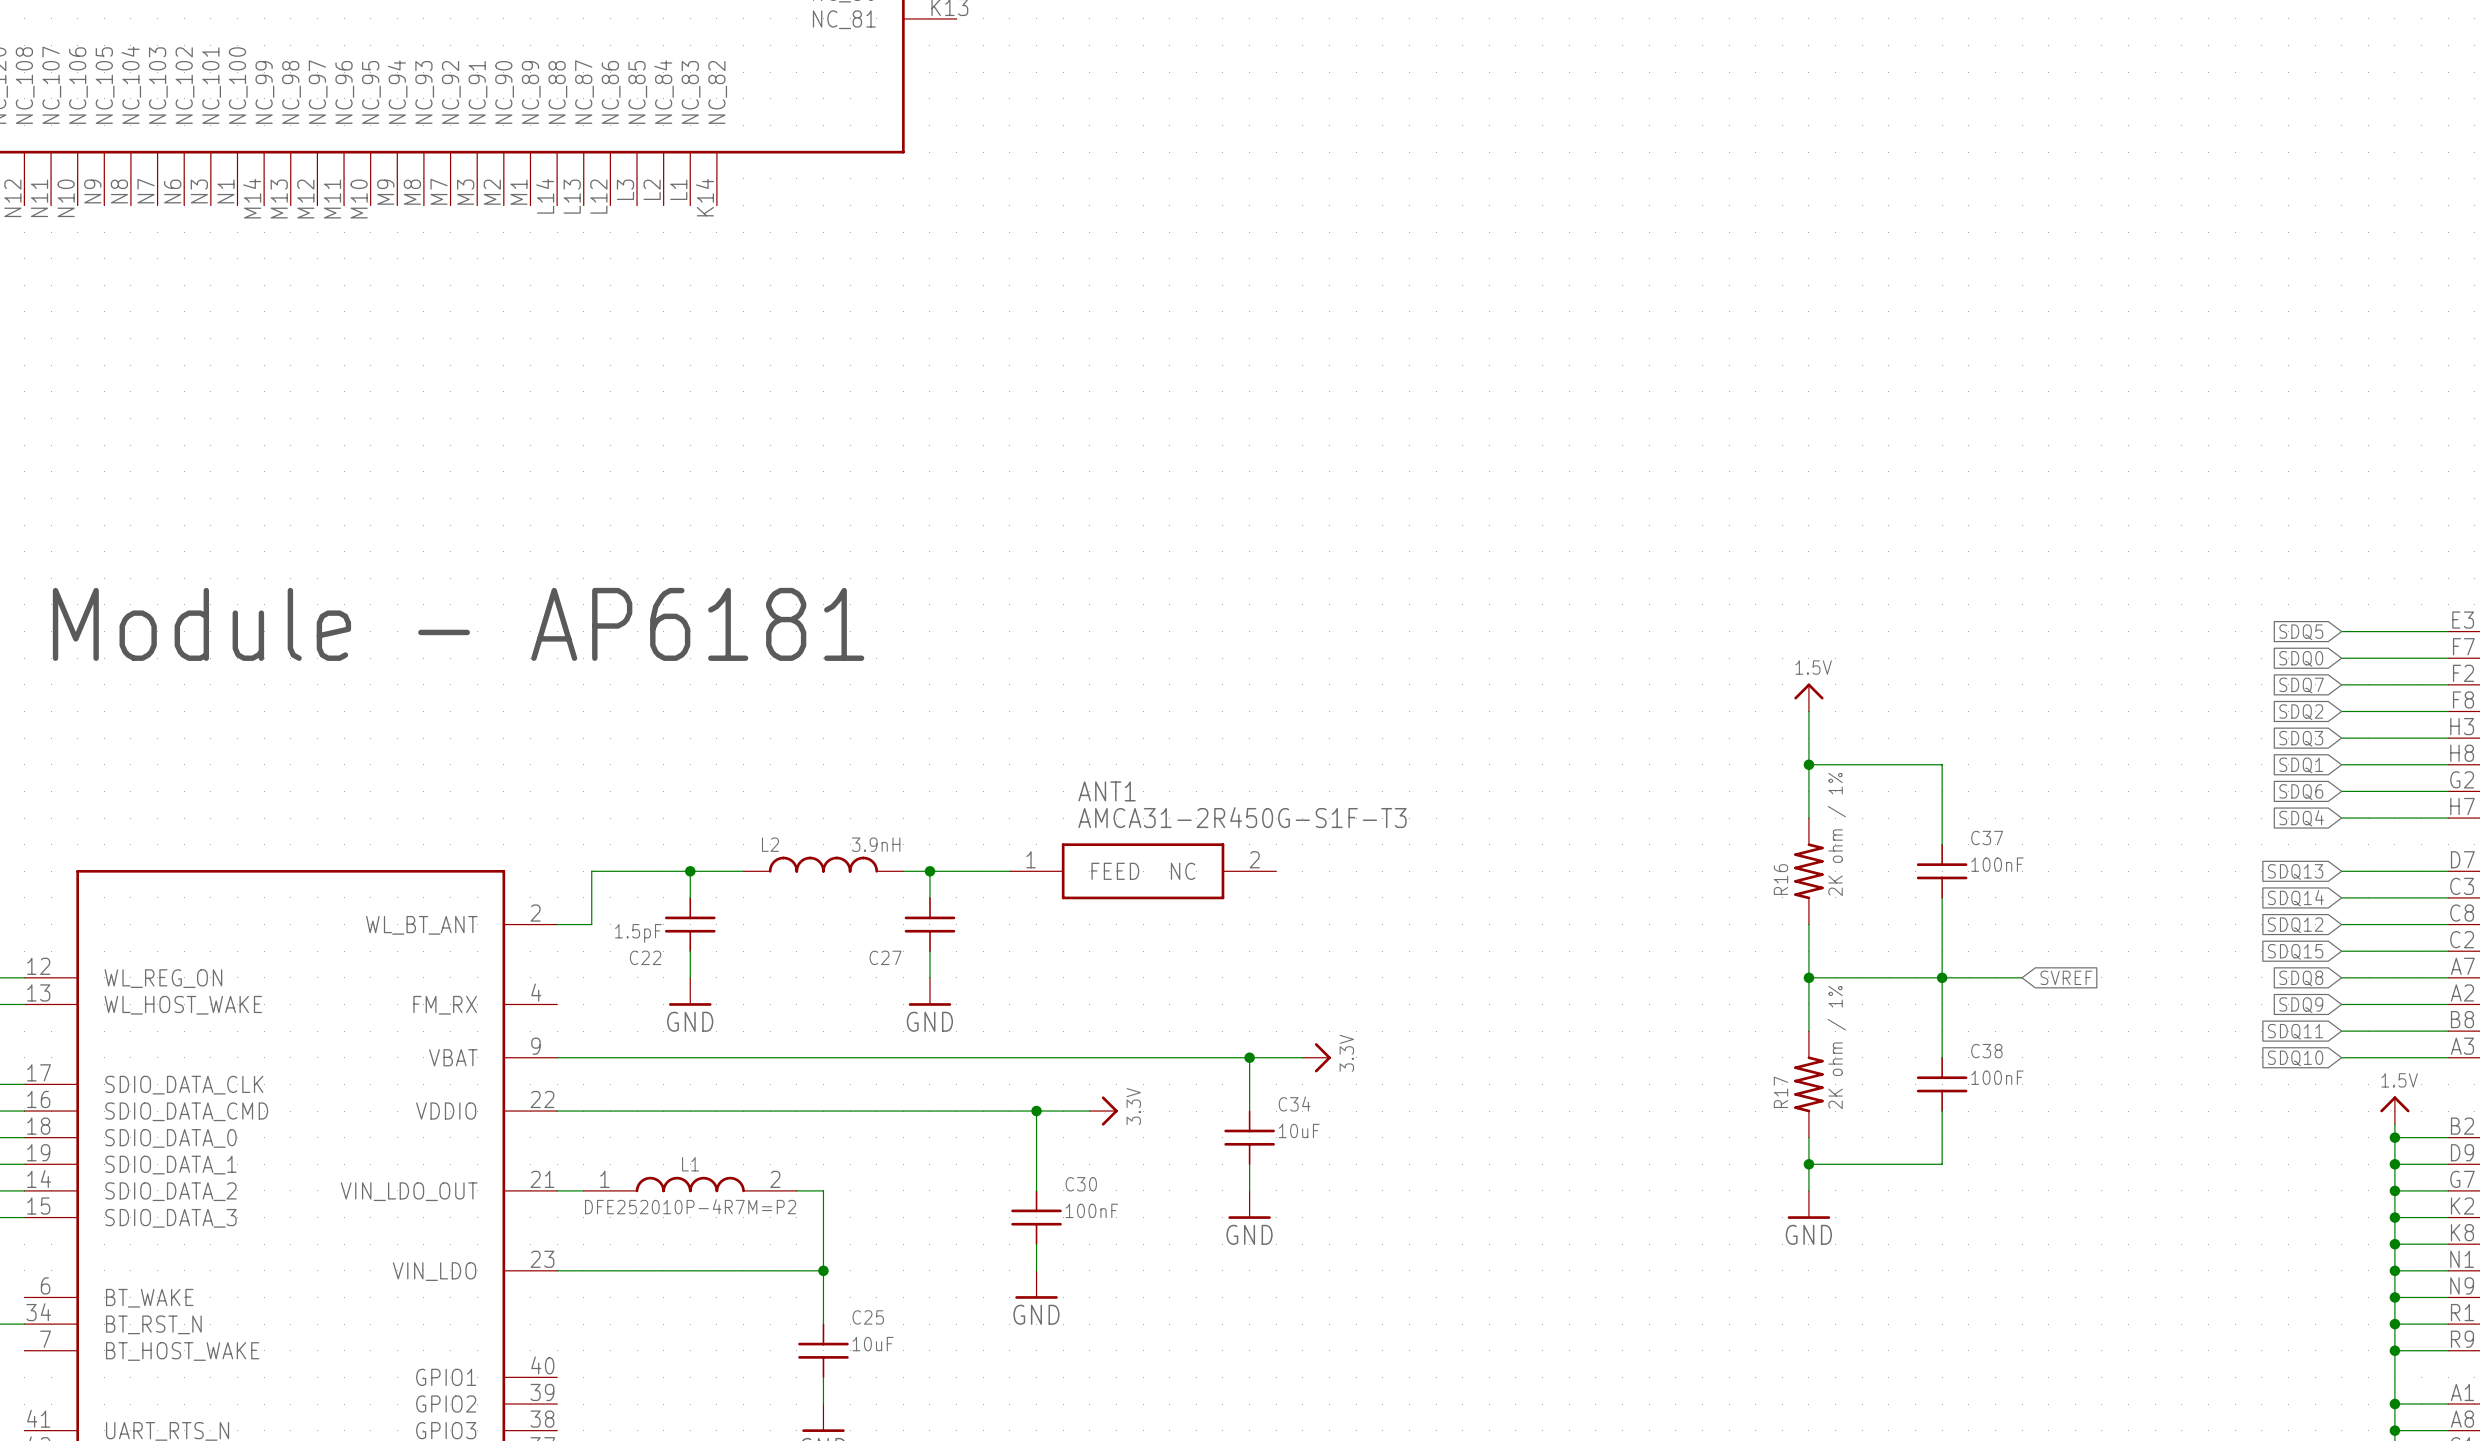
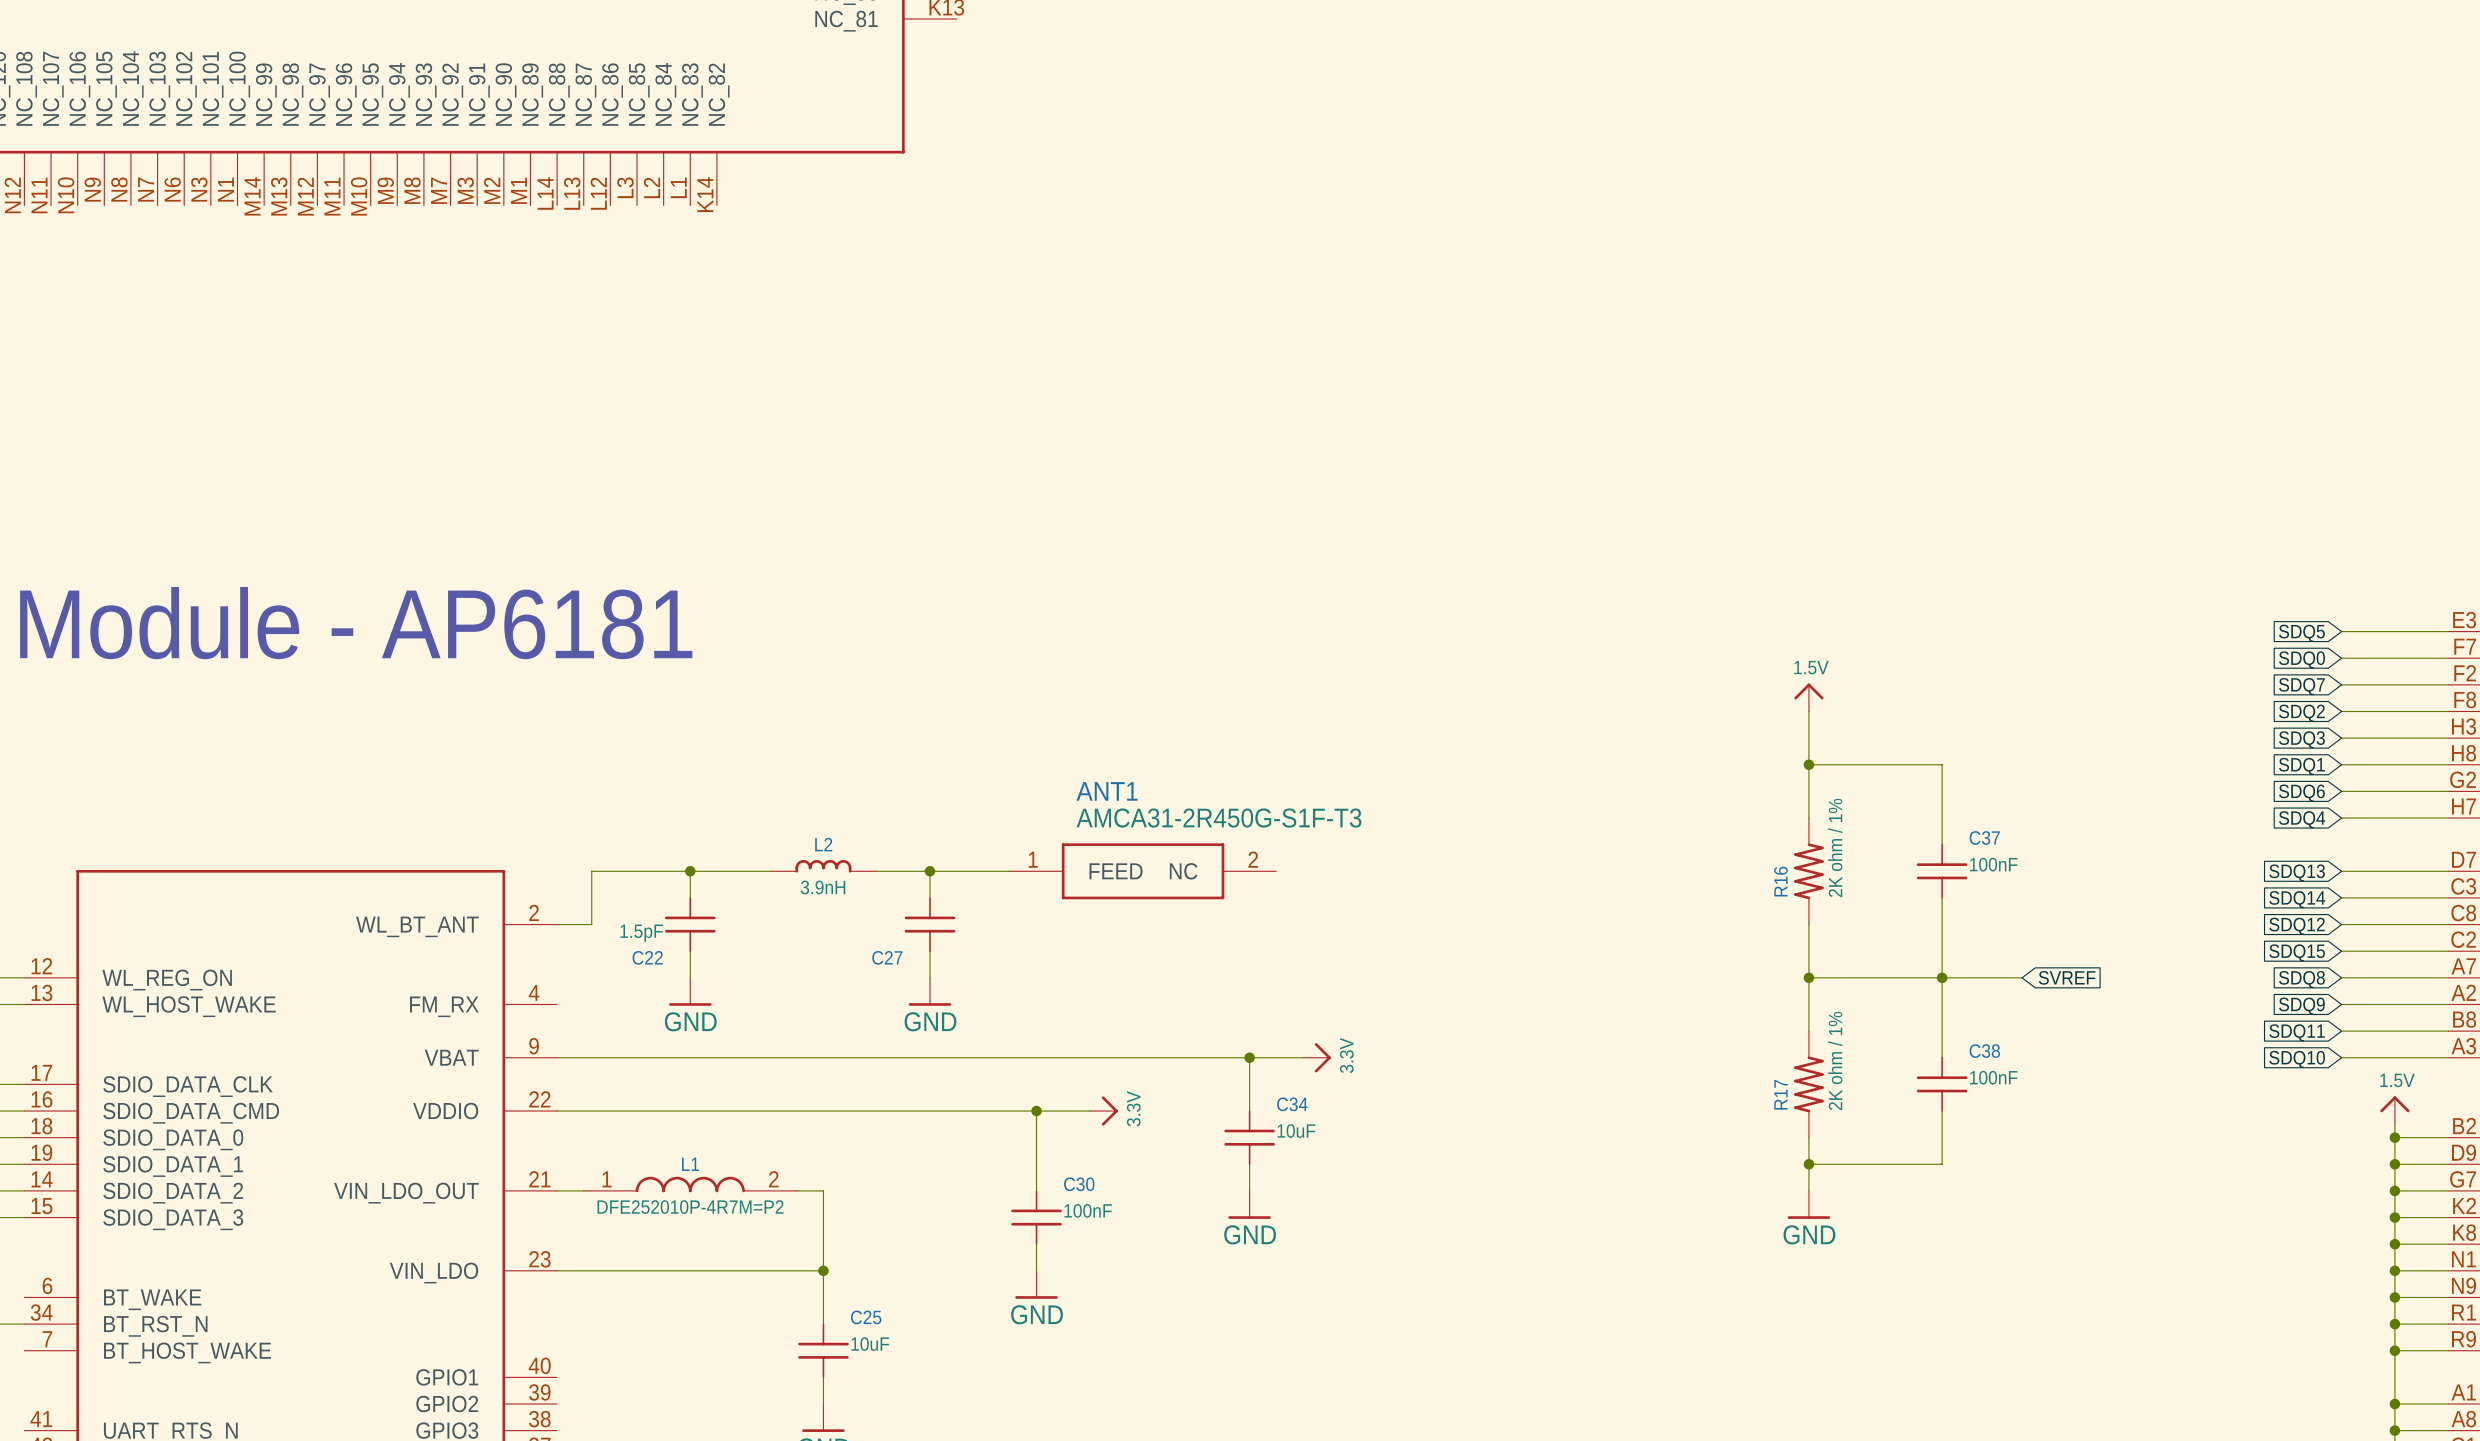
L2 name position: L2 (770, 844) -> L2 (823, 844)
L2 value position: 3.9nH (876, 844) -> 3.9nH (823, 887)
L2 symbol: [743, 856, 904, 873] -> [770, 859, 877, 873]

